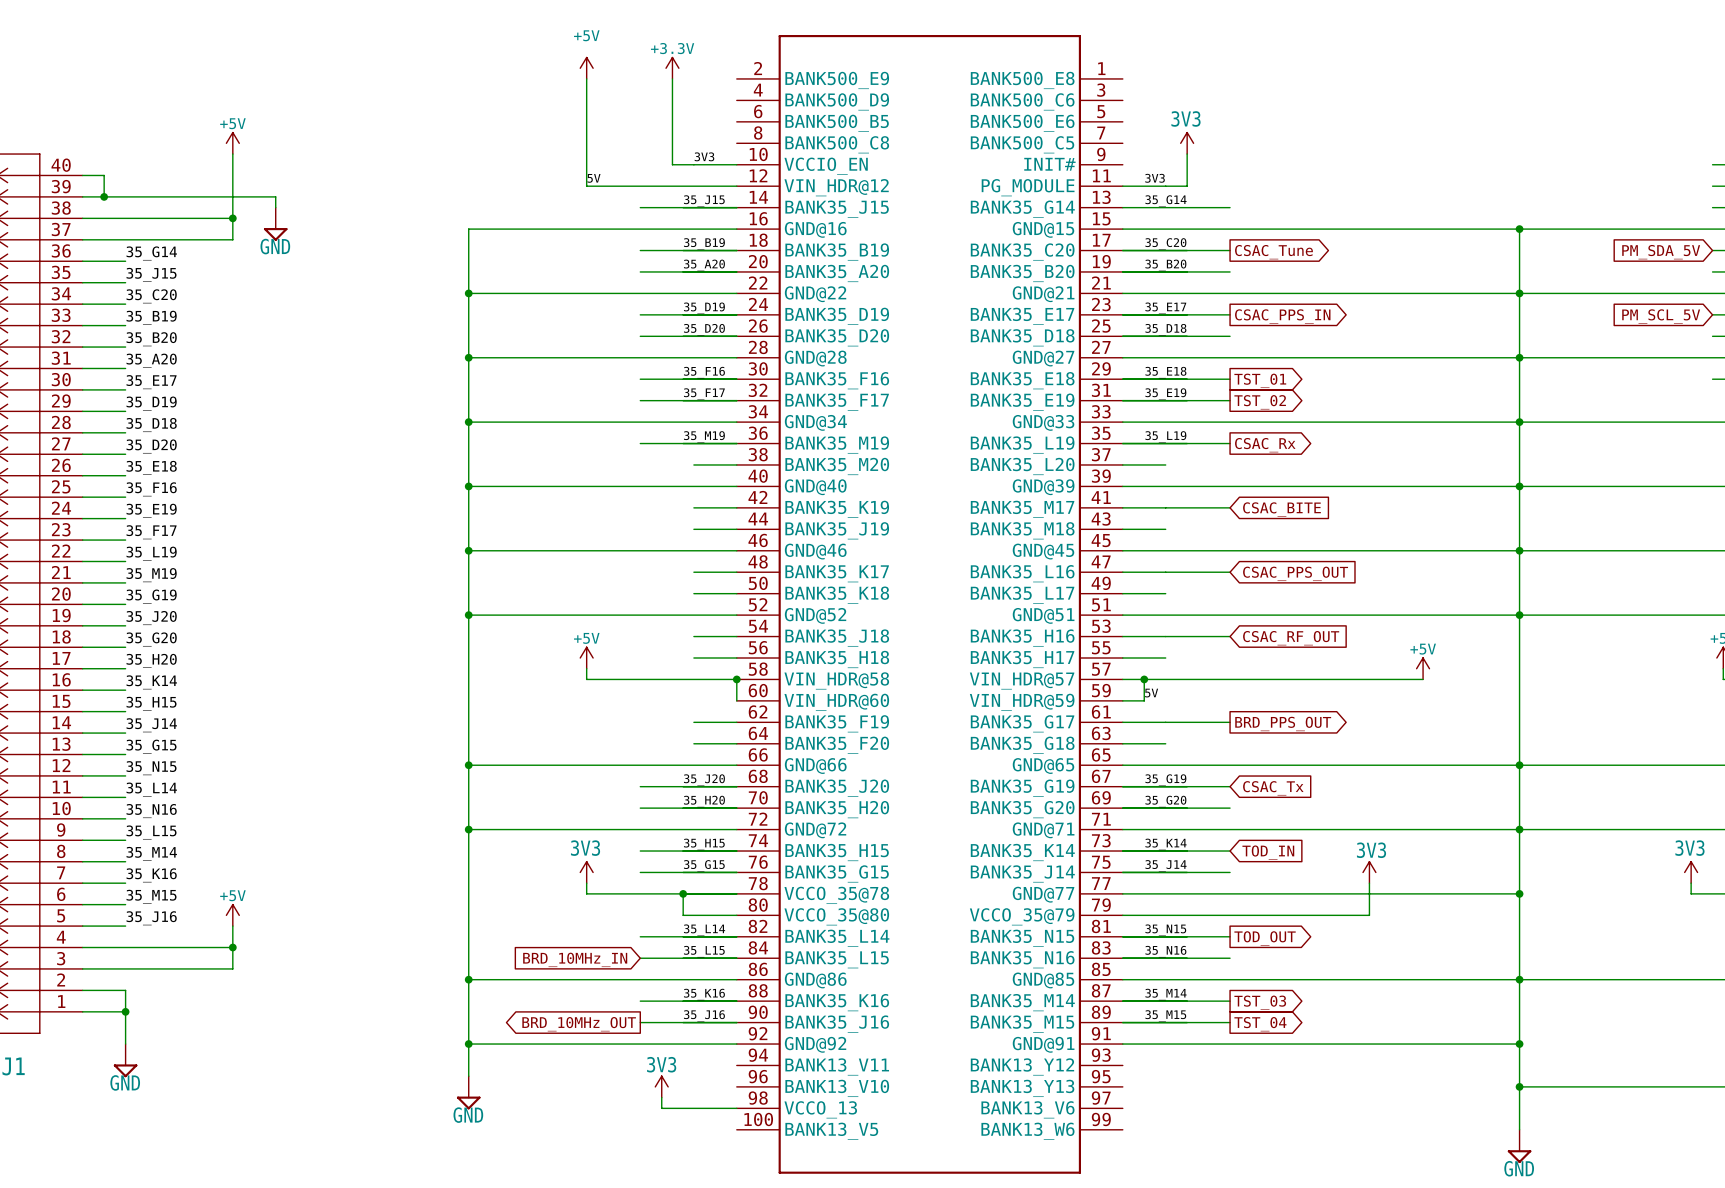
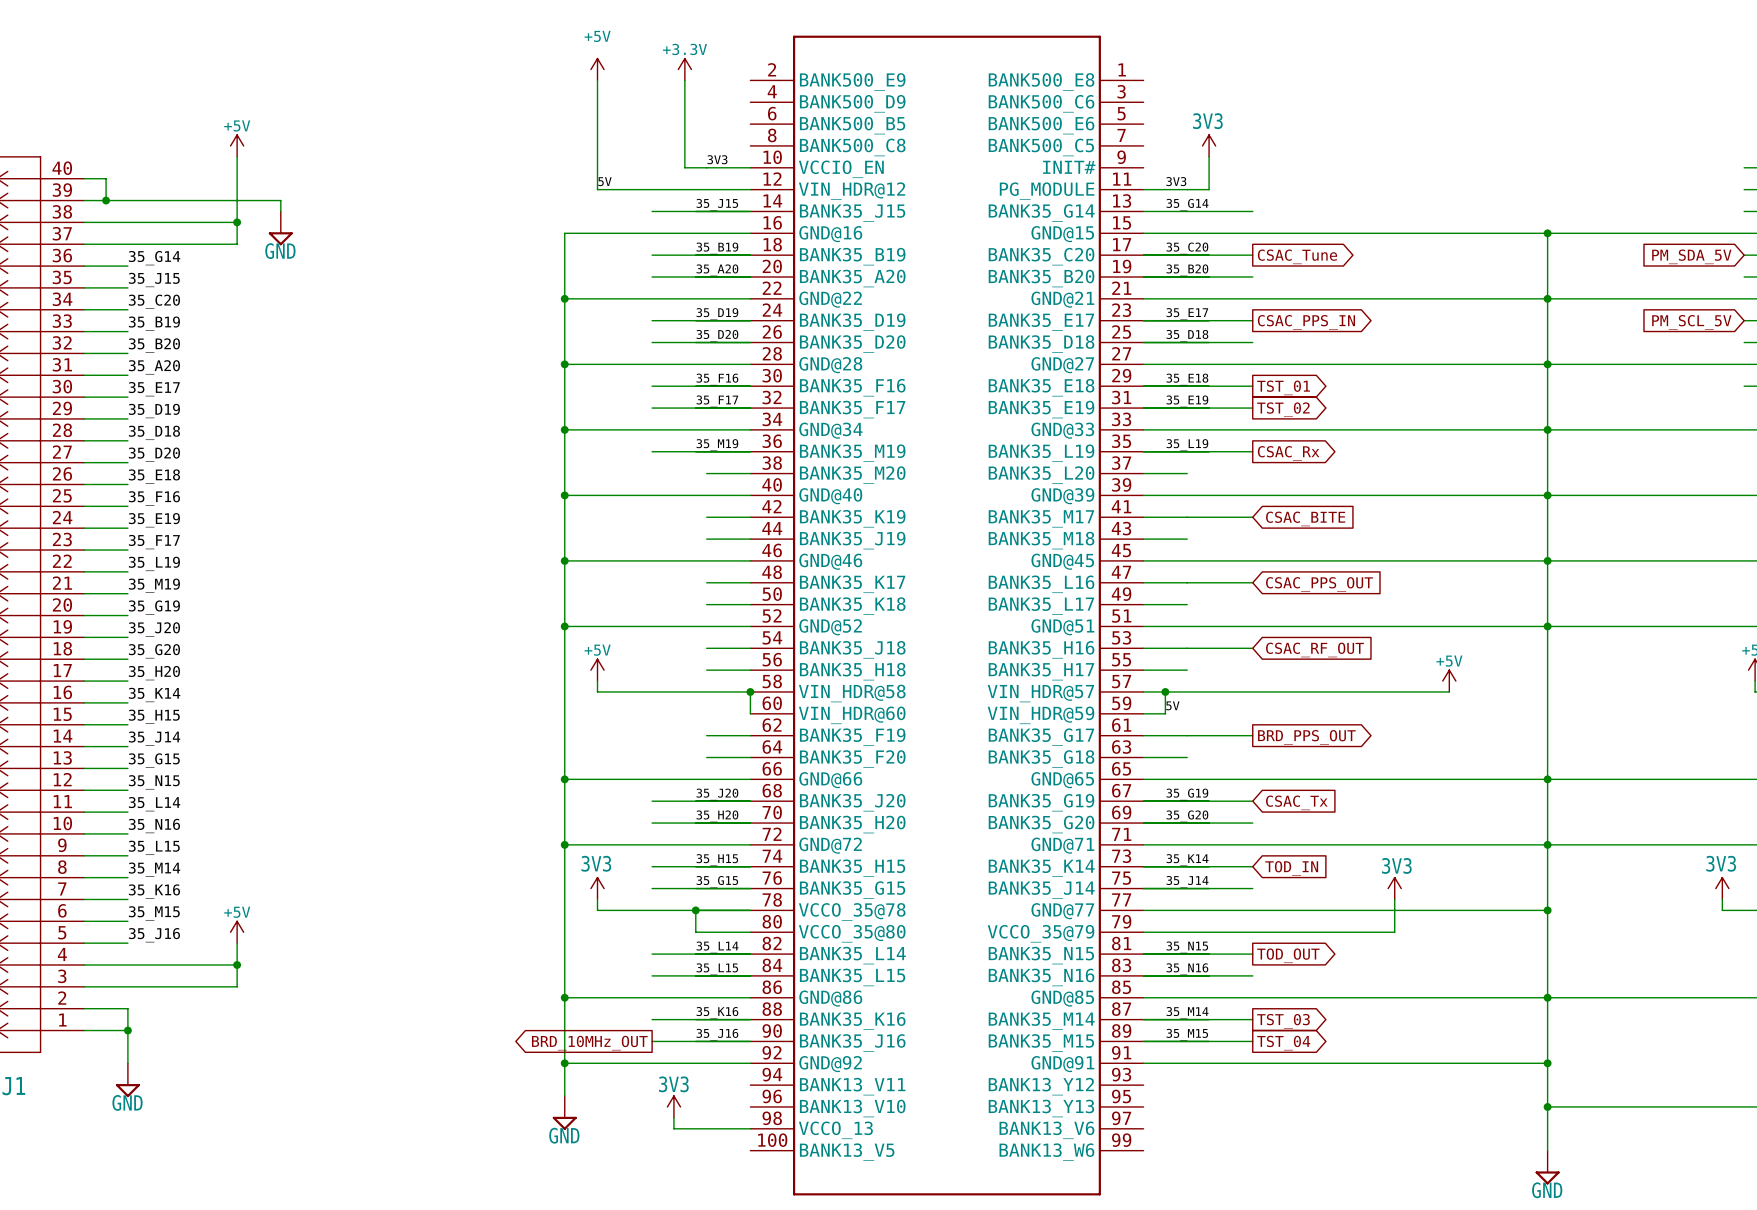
wire: (554, 229) (468, 229) (468, 1076) -> (564, 233) (564, 1096)
wire: (468, 293) (554, 293) -> none
junction: (468, 293) -> none
junction: none -> (564, 298)
wire: (468, 357) (554, 357) -> none
junction: (468, 357) -> none
junction: none -> (564, 364)
wire: (468, 422) (554, 422) -> none
junction: (468, 422) -> none
junction: none -> (564, 429)
wire: (468, 486) (554, 486) -> none
junction: (468, 486) -> none
junction: none -> (564, 495)
wire: (468, 550) (554, 550) -> none
junction: (468, 550) -> none
junction: none -> (564, 560)
wire: (468, 615) (554, 615) -> none
junction: (468, 615) -> none
junction: none -> (564, 626)
wire: (468, 765) (554, 765) -> none
junction: (468, 765) -> none
junction: none -> (564, 779)
wire: (468, 829) (554, 829) -> none
junction: (468, 829) -> none
junction: none -> (564, 844)
global label: BRD_10MHz_IN (575, 959) -> none
wire: (468, 979) (554, 979) -> none
junction: (468, 979) -> none
junction: none -> (564, 997)
wire: (468, 1044) (554, 1044) -> none
junction: (468, 1044) -> none
junction: none -> (564, 1063)
power symbol position: GND (468, 1092) -> GND (564, 1112)

